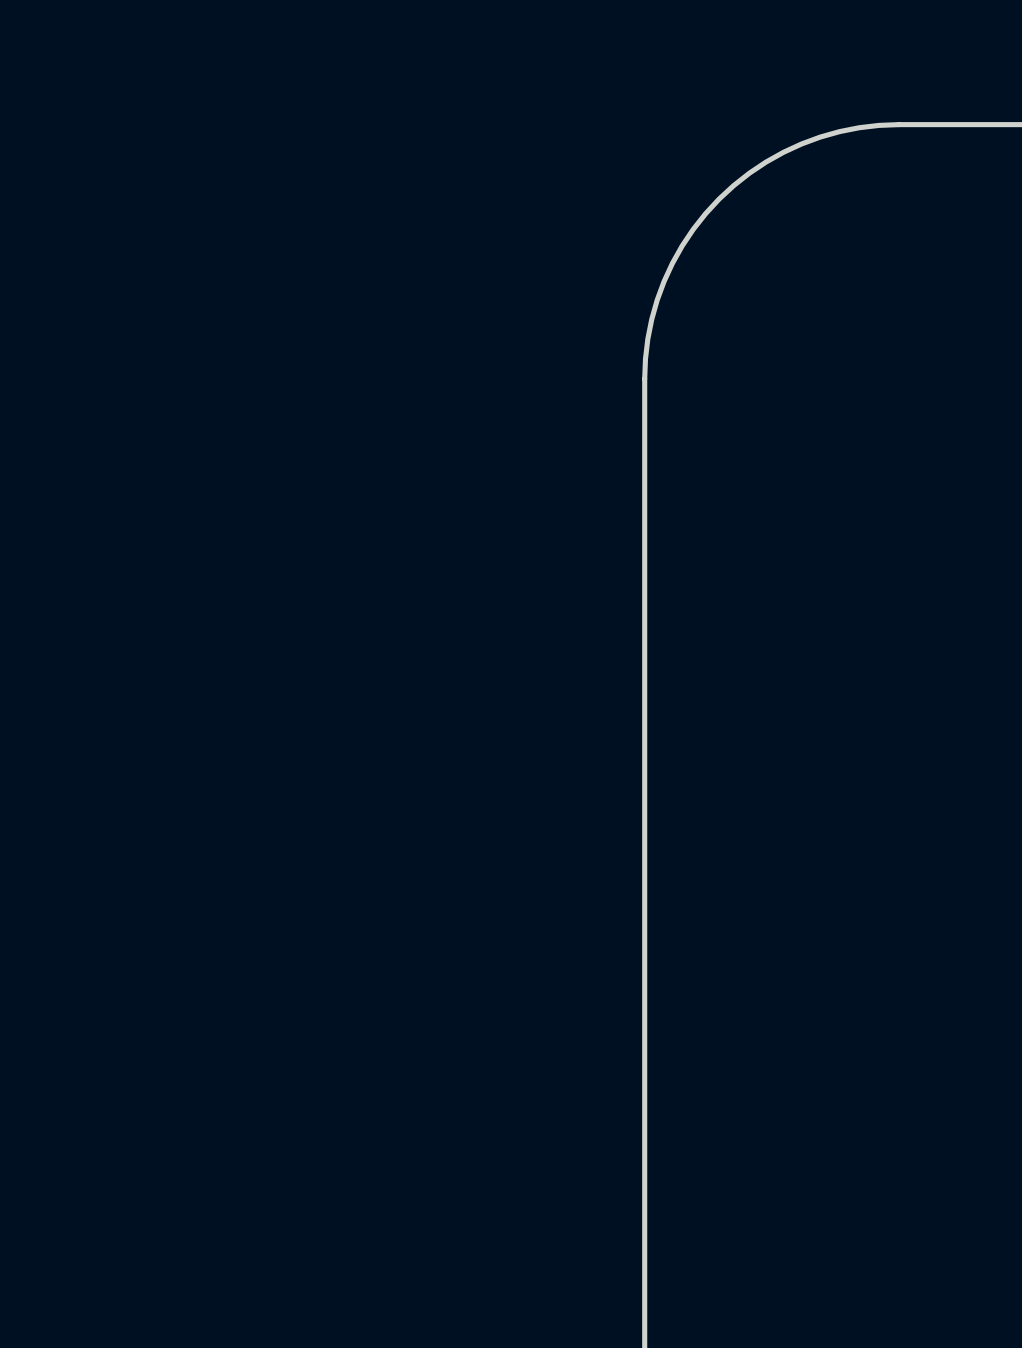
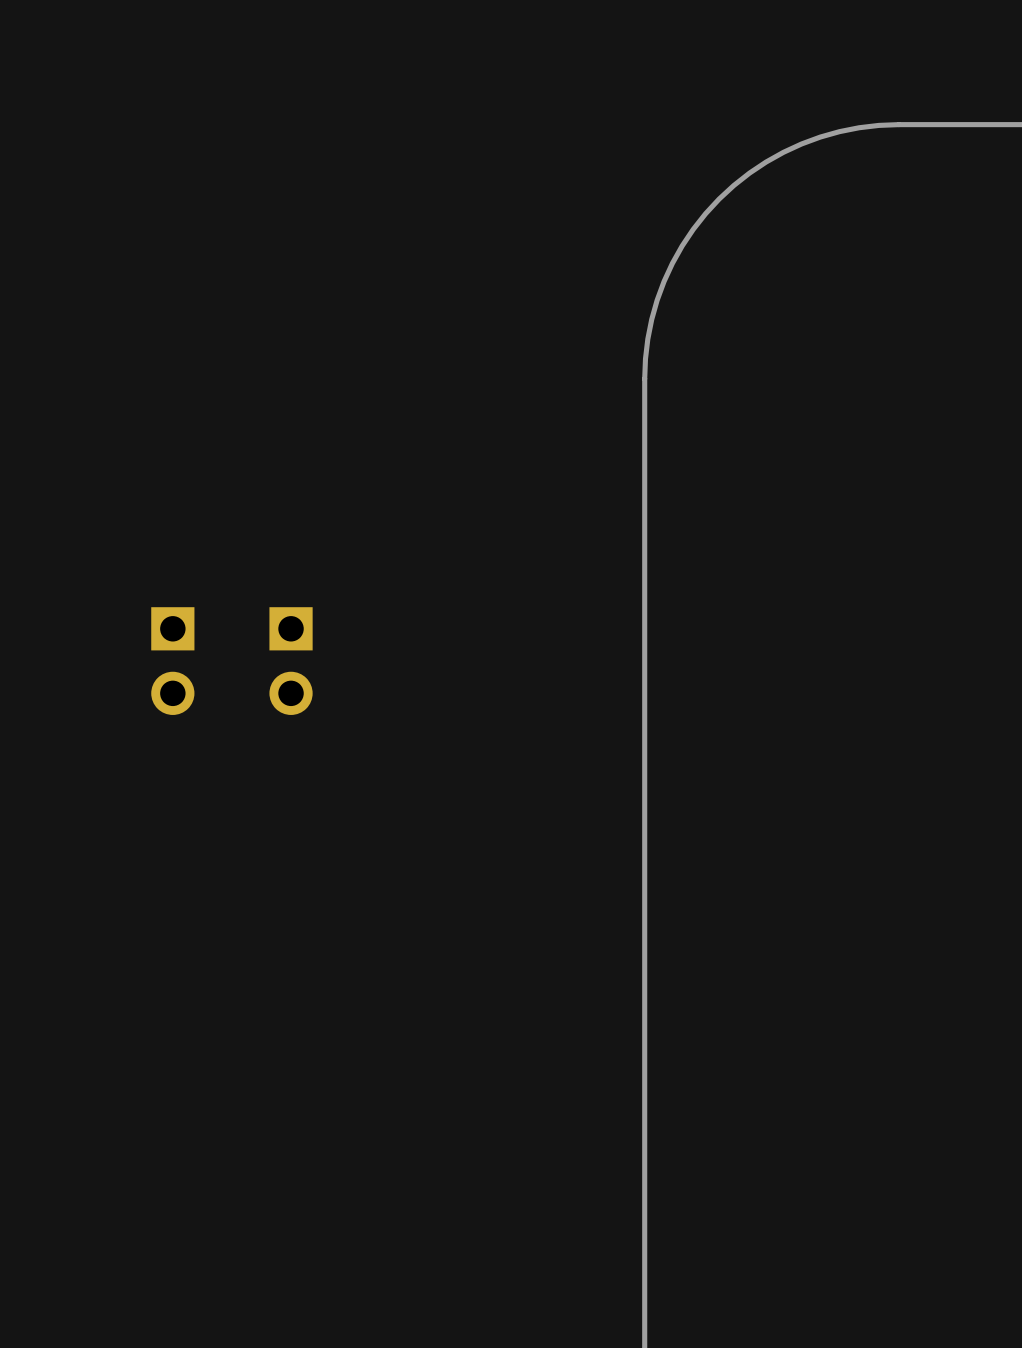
part: none -> (172, 661)
part: none -> (291, 661)

